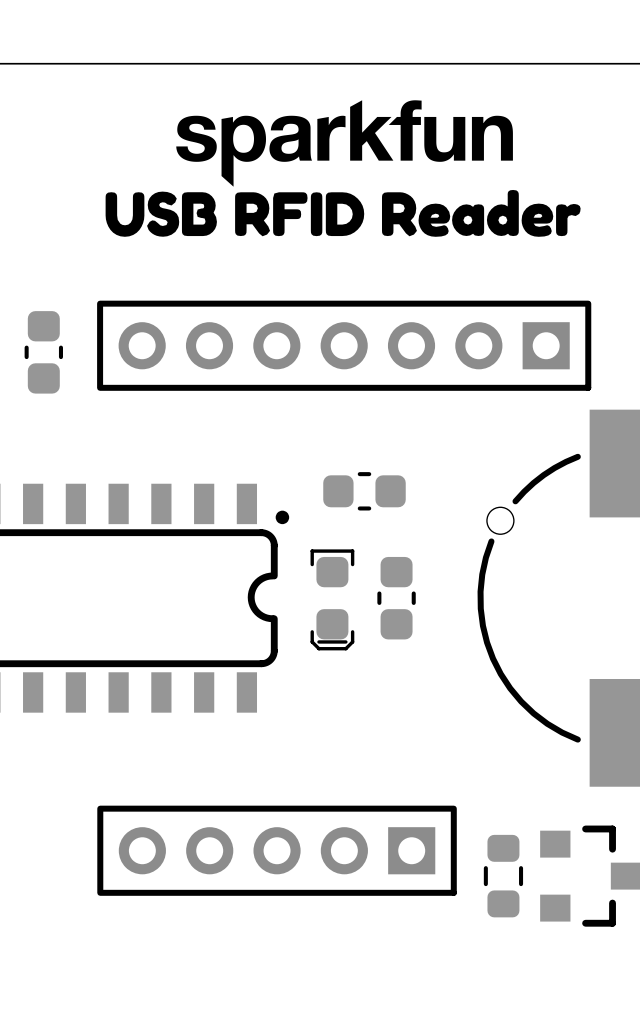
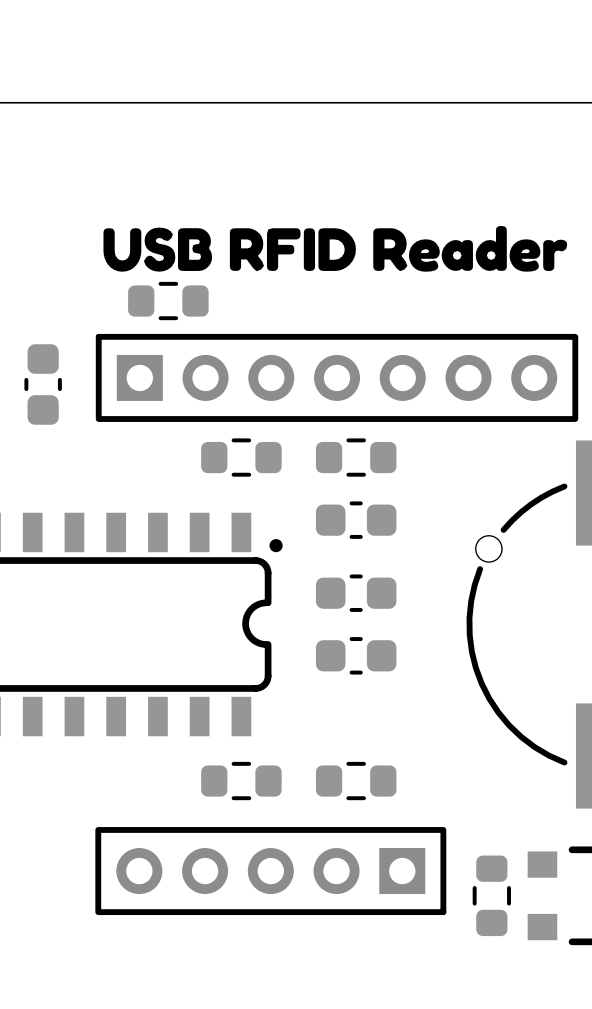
drawing: [176, 100, 513, 187] -> none
part: none -> (168, 301)
part rotation: 0° (344, 345) -> 180° (337, 377)
part: none -> (241, 457)
part: none -> (356, 457)
part: none -> (356, 593)
part: (396, 598) -> none
part: (332, 599) -> none
part: none -> (356, 655)
part: none -> (241, 781)
part: none -> (356, 781)

